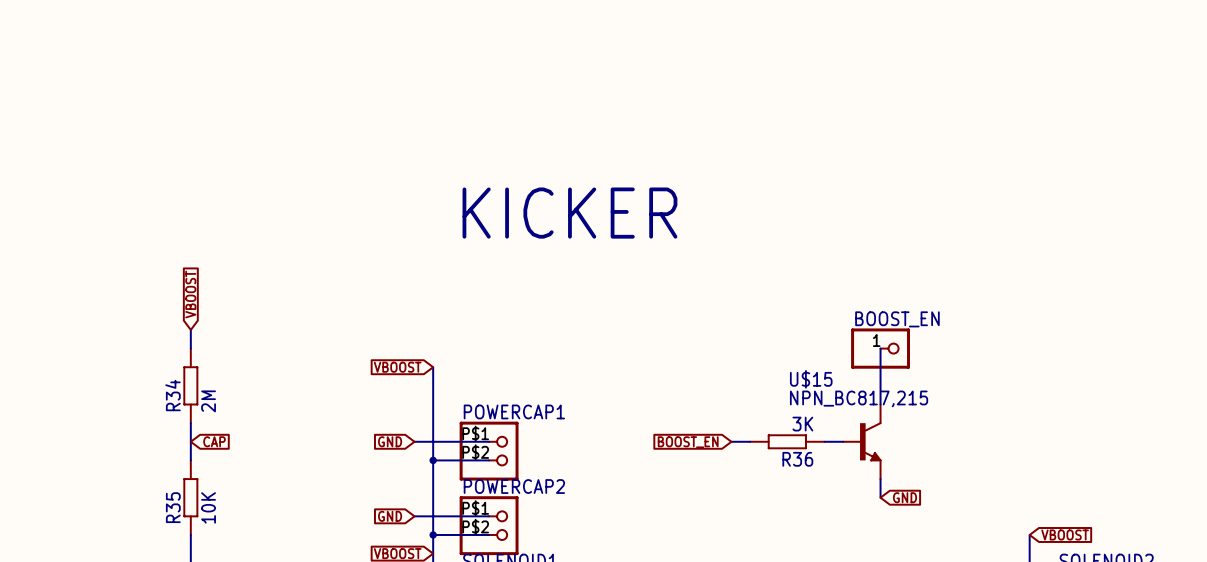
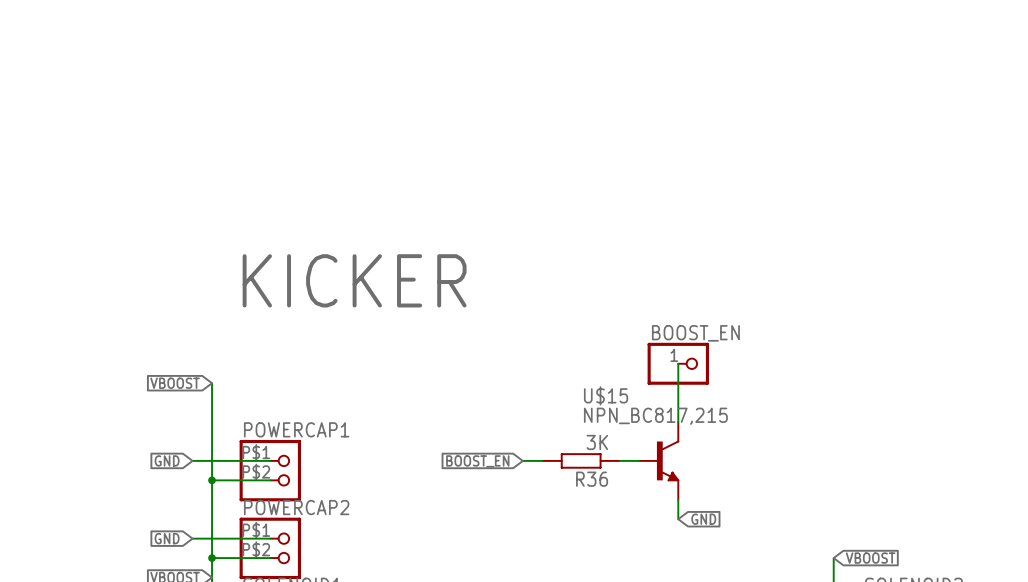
text position: KICKER (569, 213) -> KICKER (354, 280)

